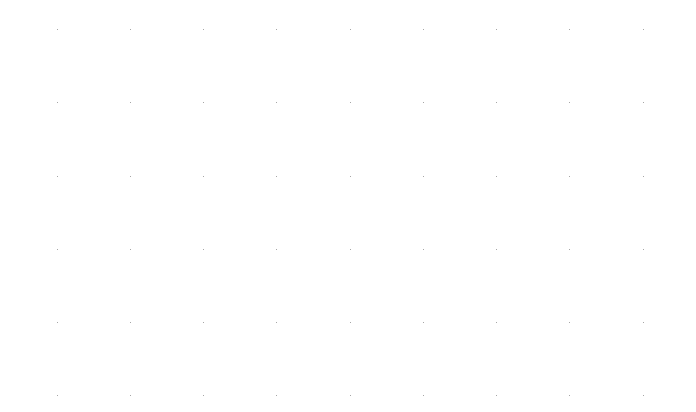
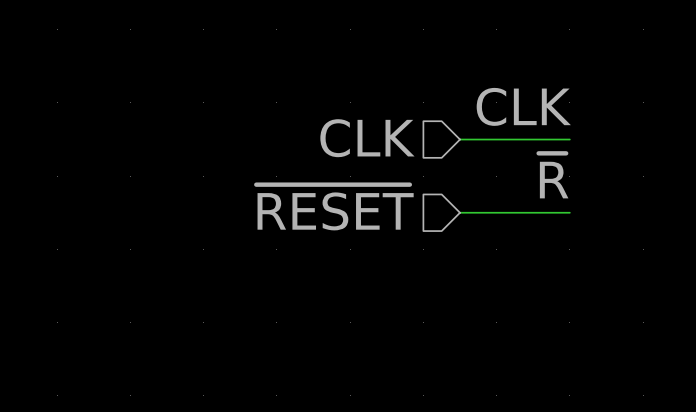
label: none -> CLK (523, 106)
hierarchical label: none -> CLK (367, 138)
wire: none -> (460, 139) (569, 139)
label: none -> ~{R} (553, 175)
hierarchical label: none -> ~{RESET} (334, 207)
wire: none -> (460, 212) (569, 212)

